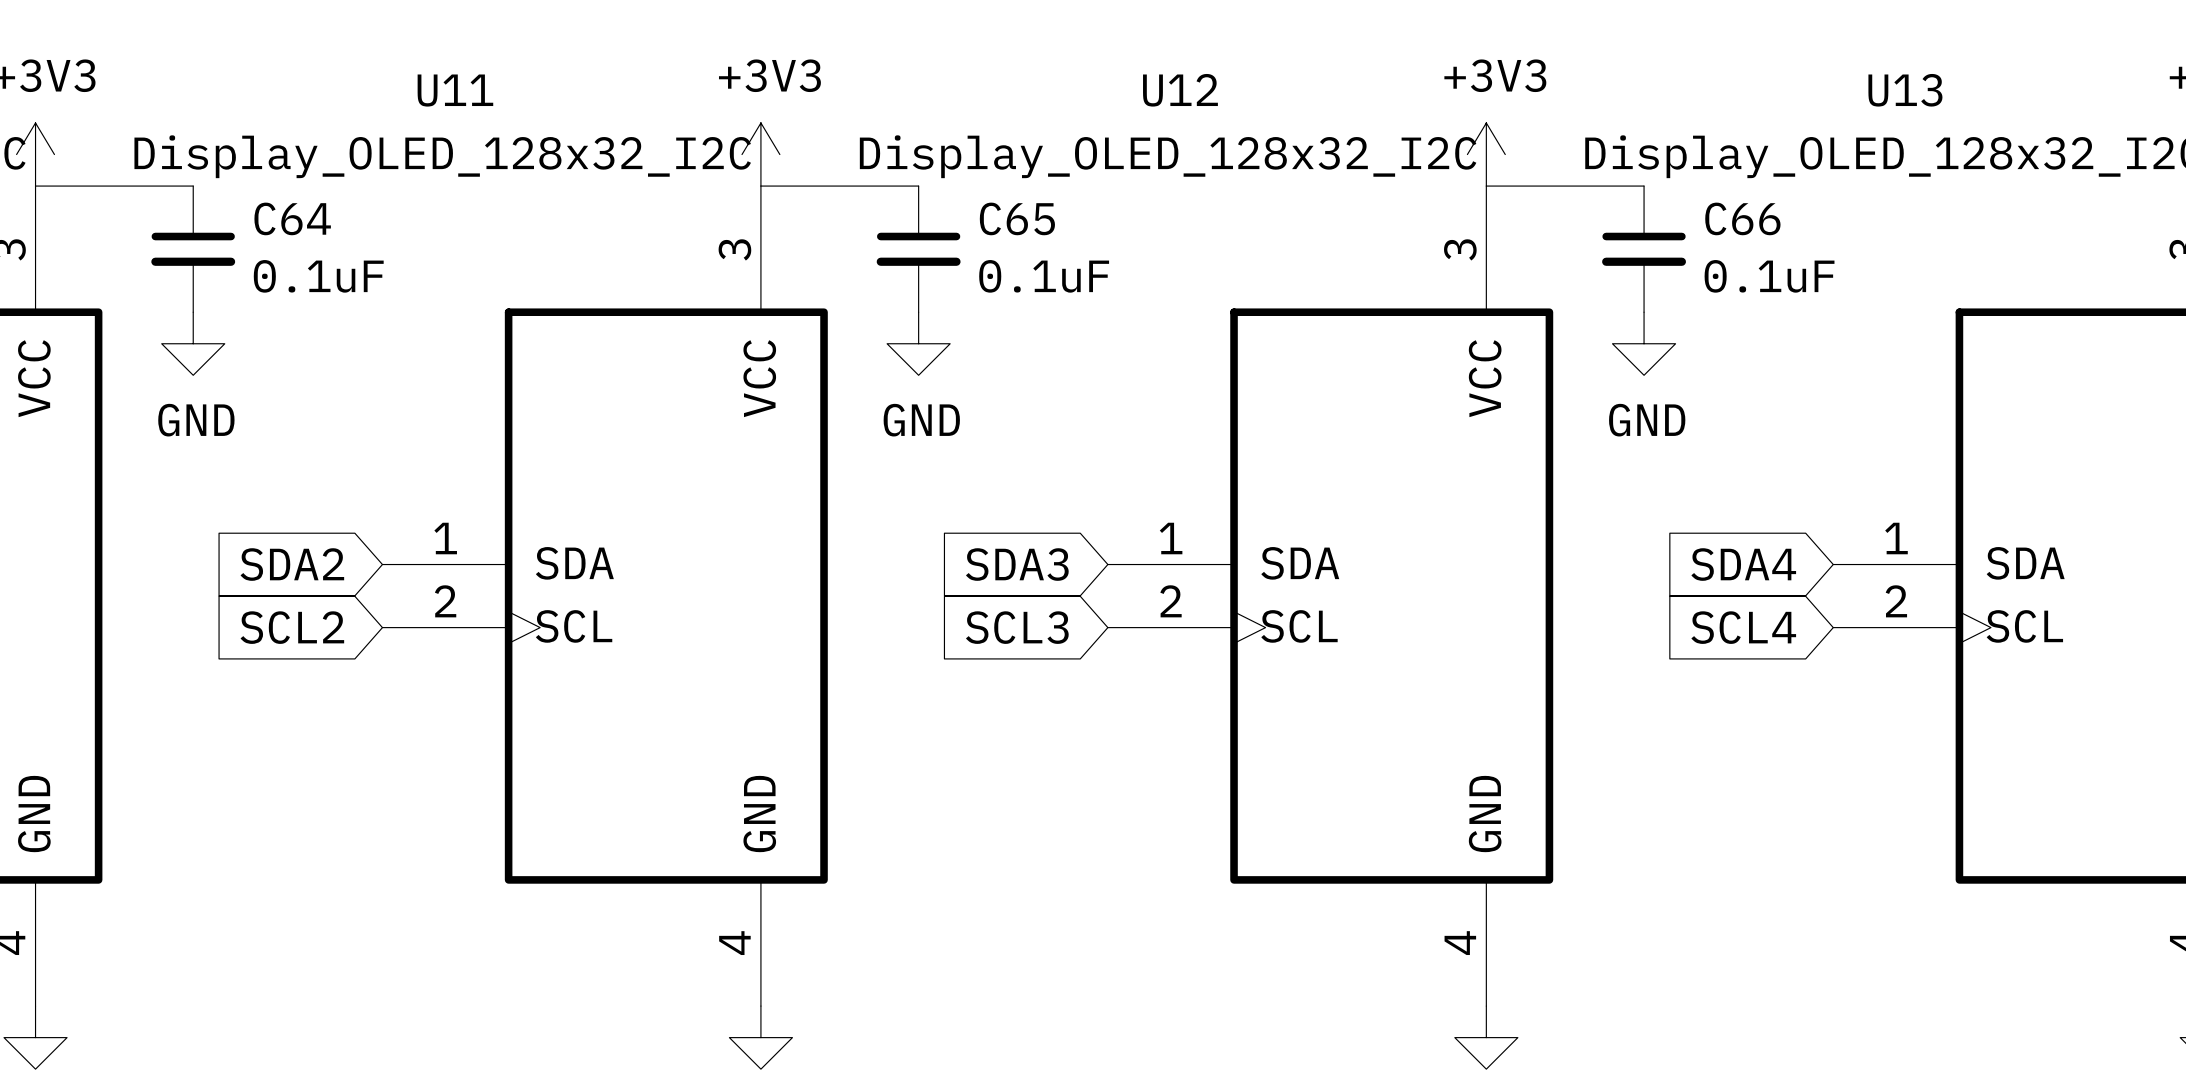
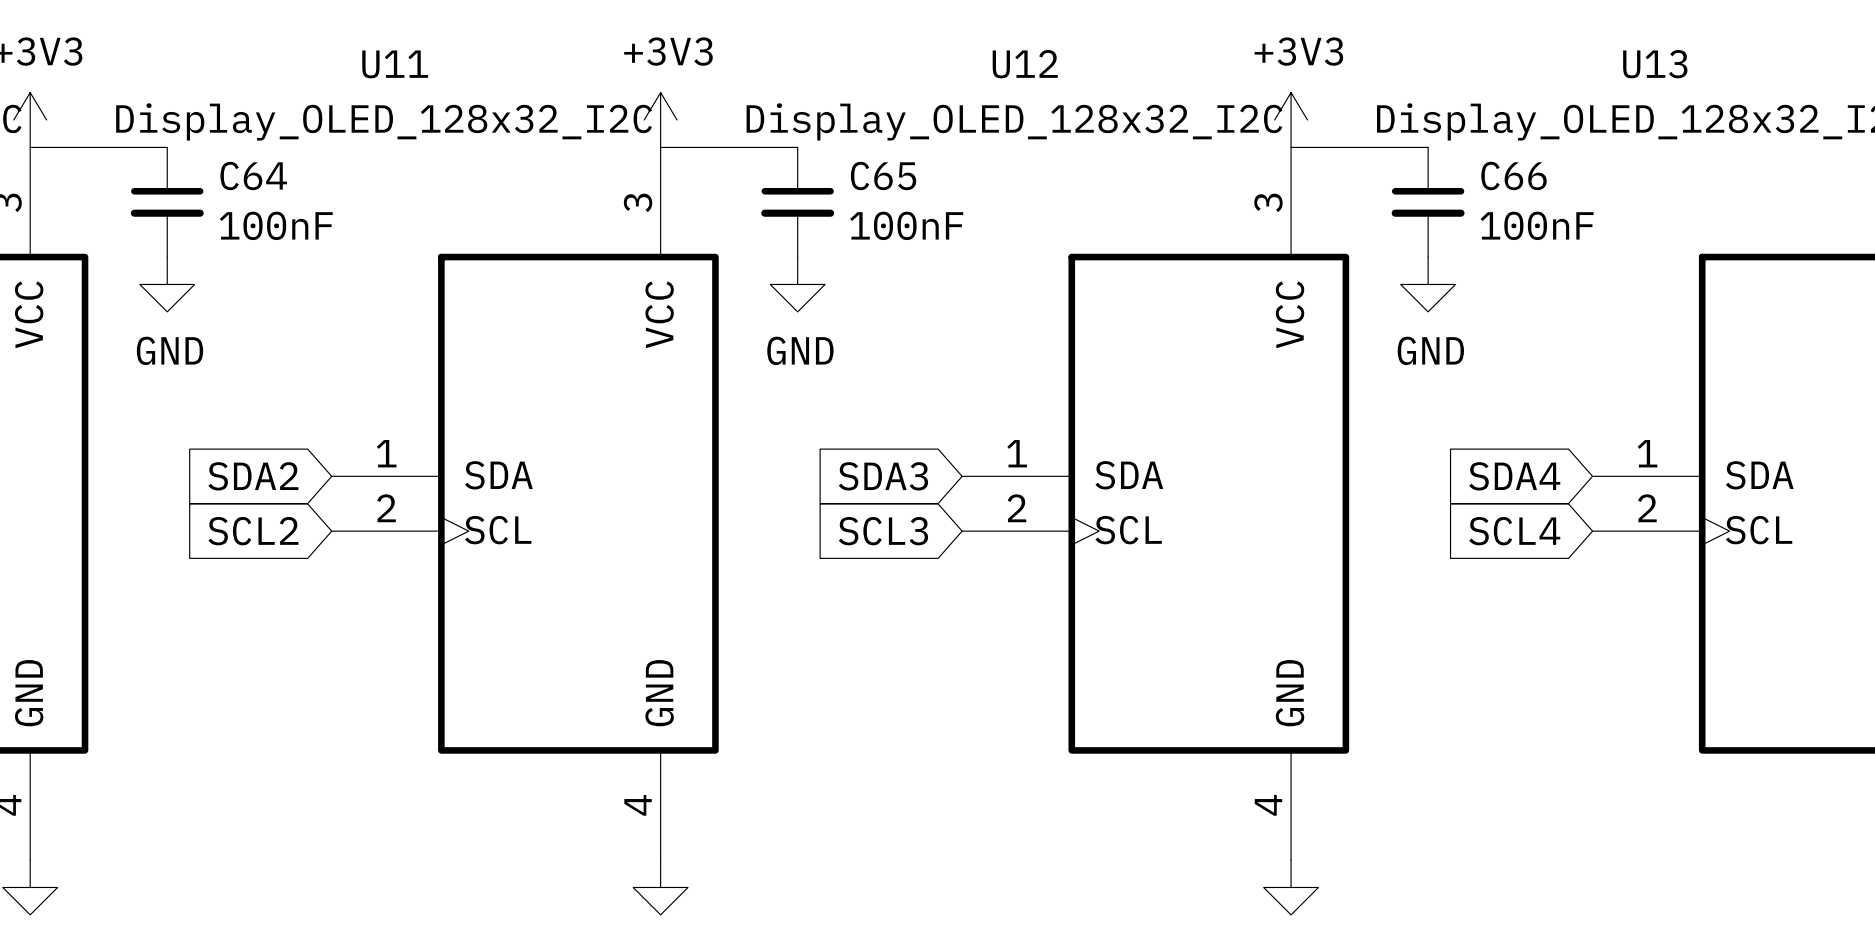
C64 value: 0.1uF (318, 276) -> 100nF (276, 225)
C65 value: 0.1uF (1044, 276) -> 100nF (906, 225)
C66 value: 0.1uF (1769, 276) -> 100nF (1537, 225)

